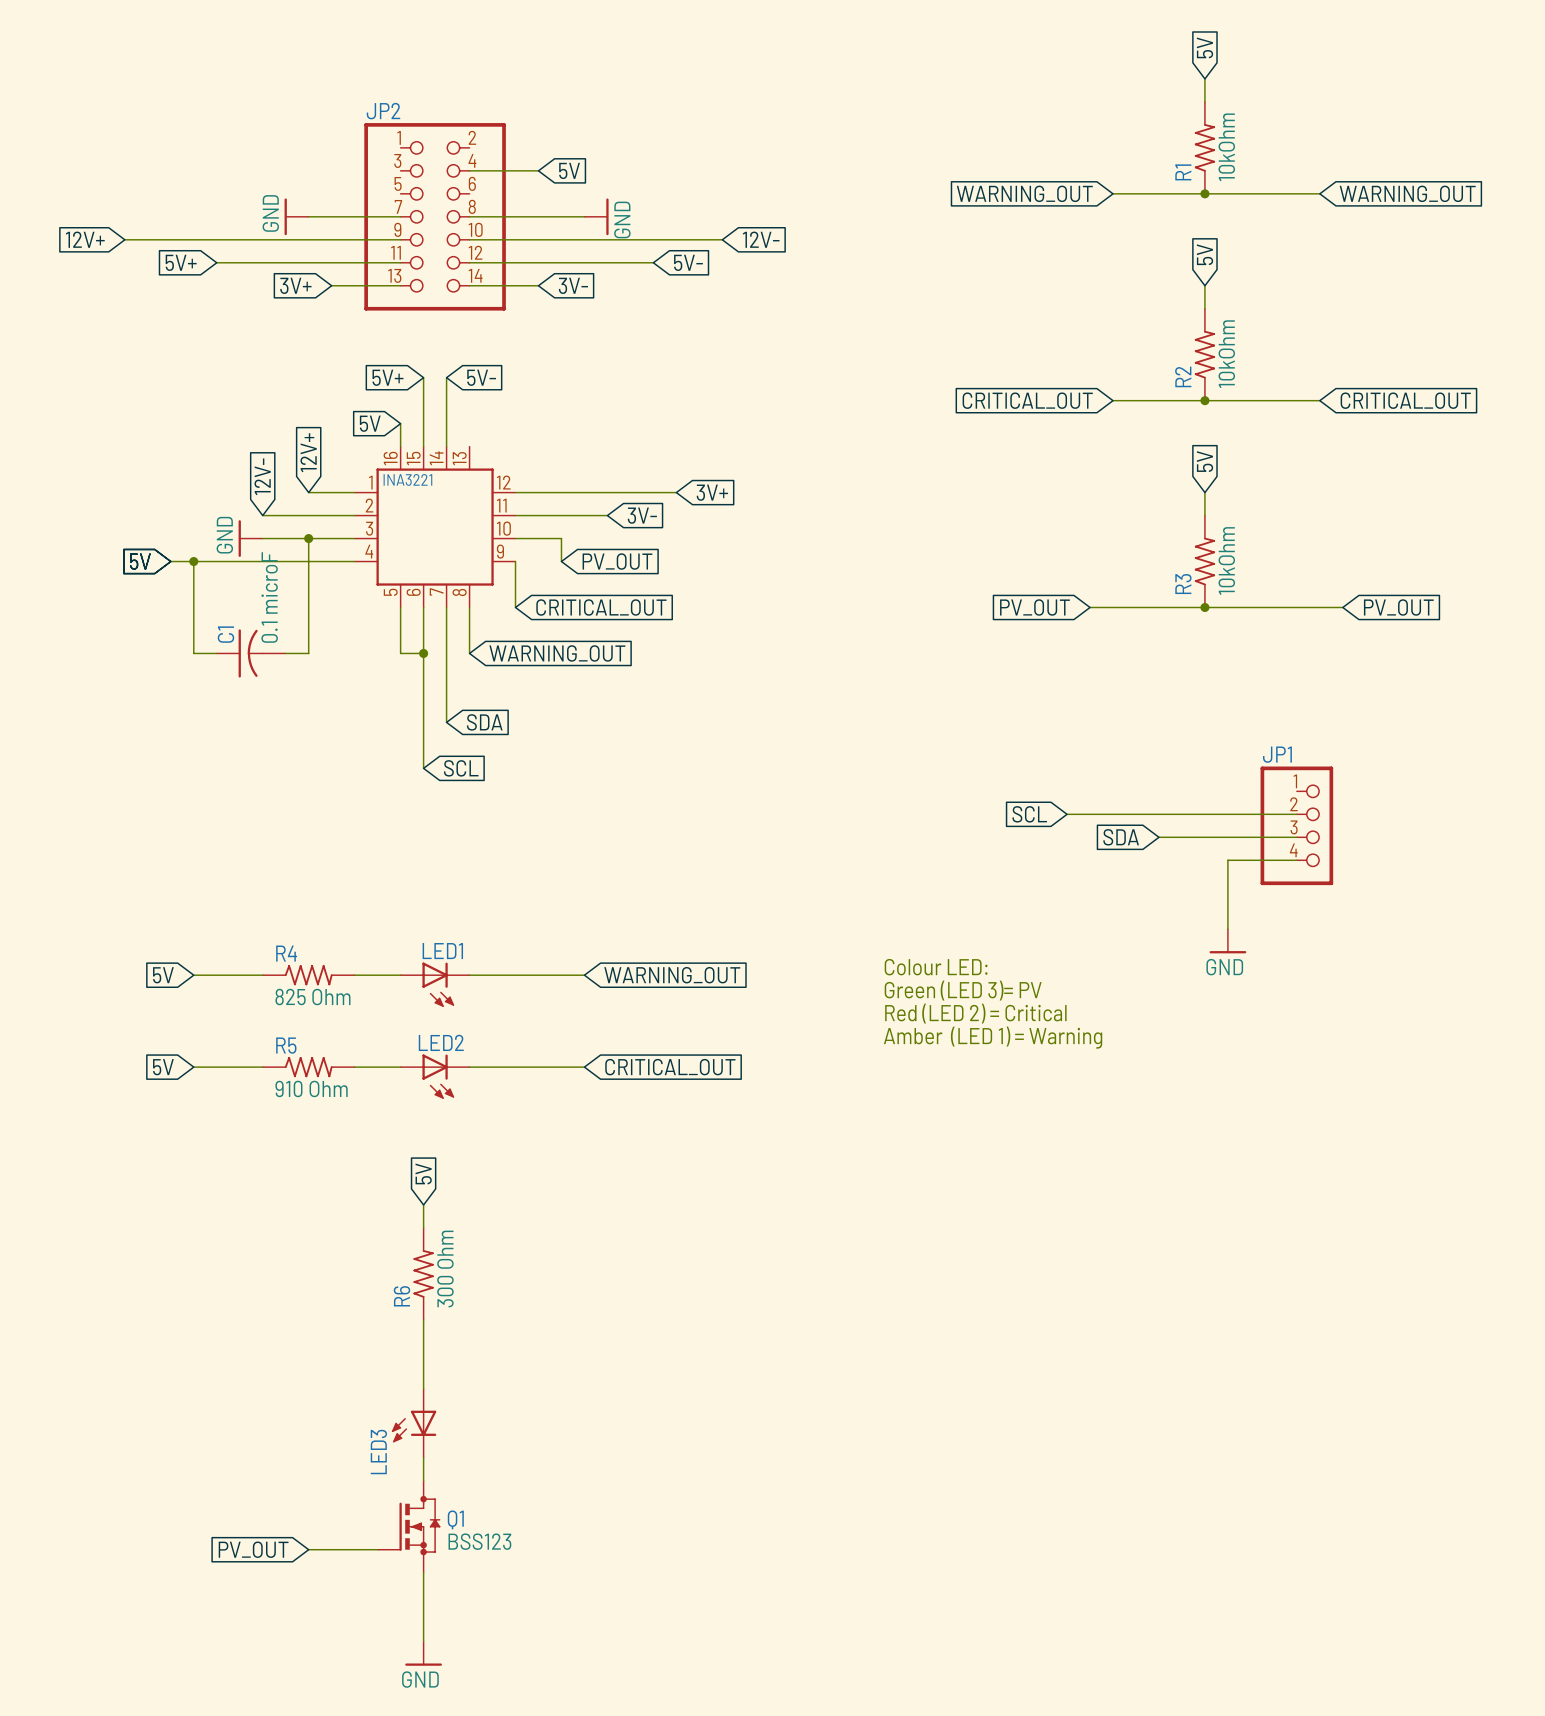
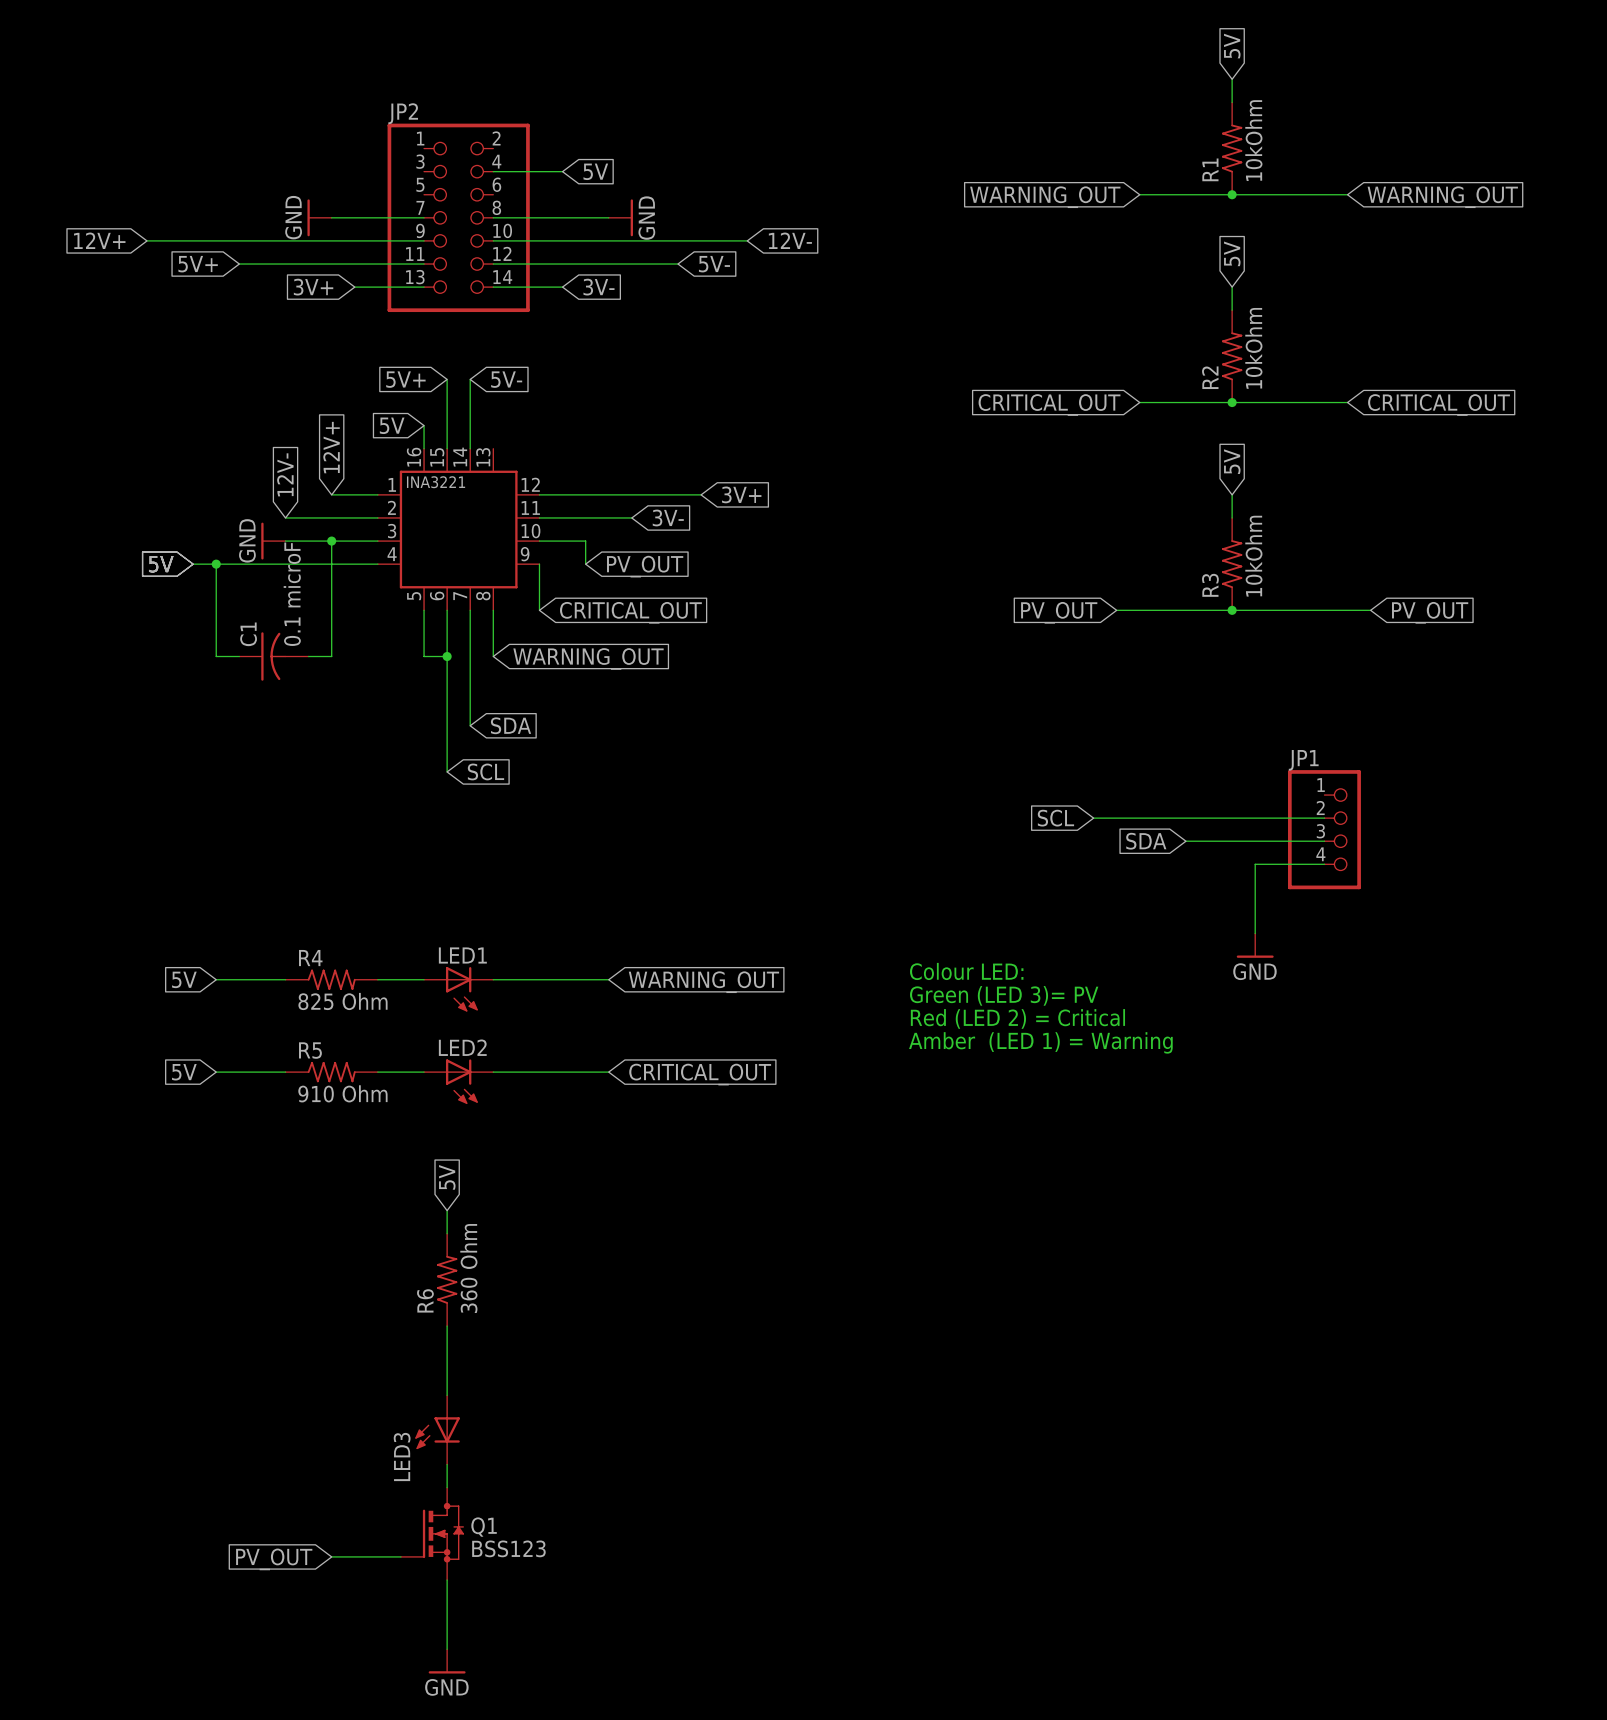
R6 value: 300 Ohm (445, 1269) -> 360 Ohm (468, 1268)

